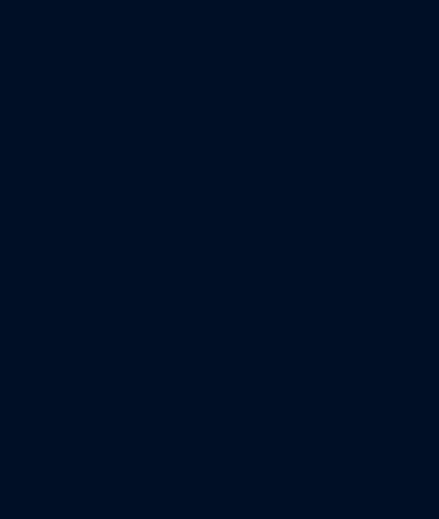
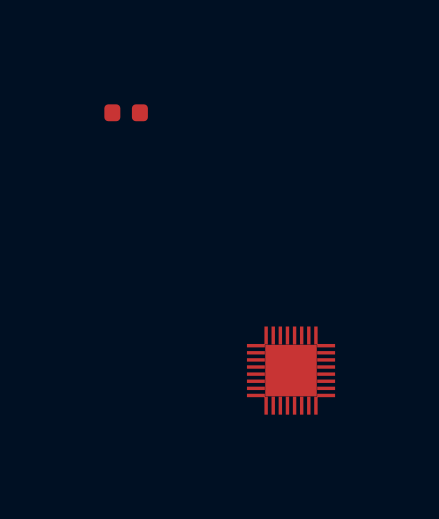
part: none -> (126, 112)
part: none -> (291, 370)

